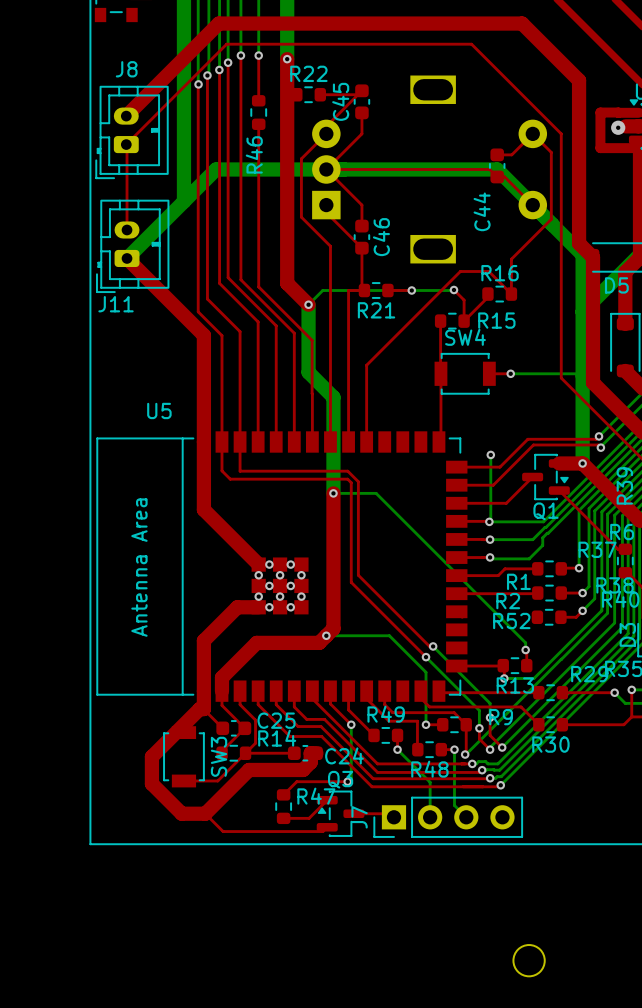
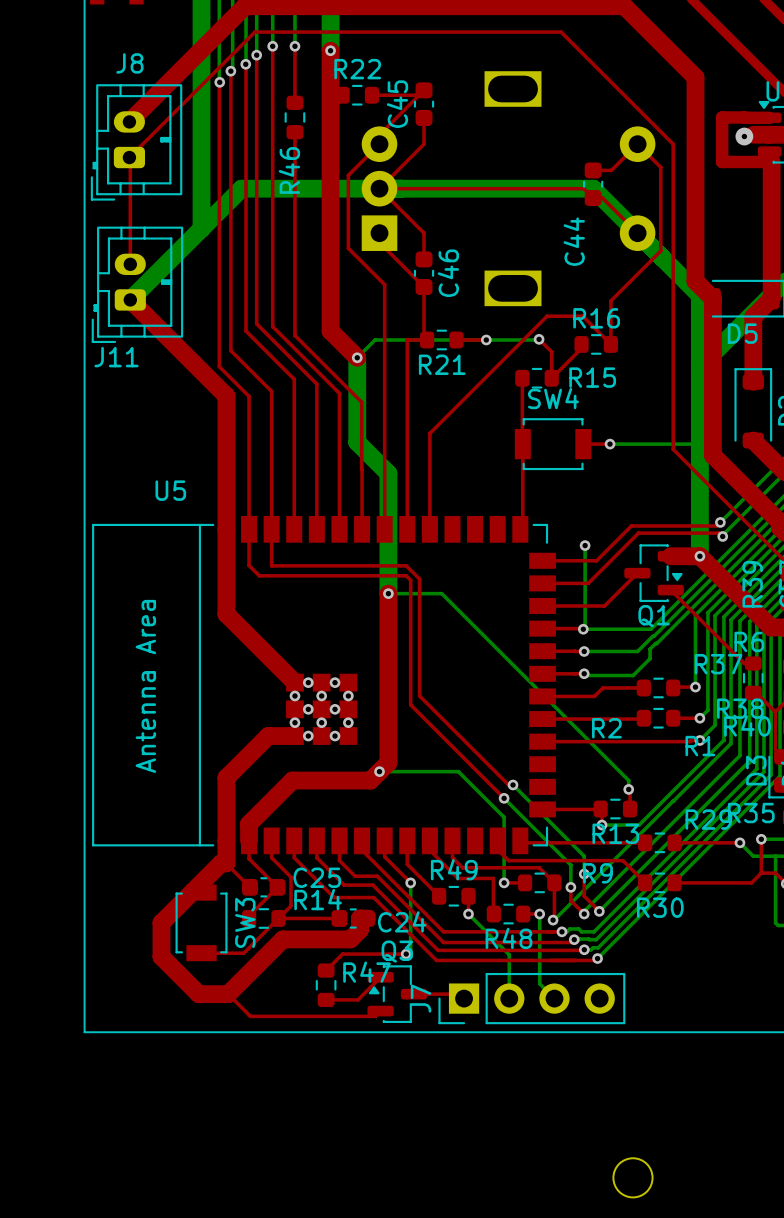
R1 name position: R1 (518, 581) -> R1 (700, 746)
top track: (582, 610) (576, 617) (560, 617) -> (699, 740) (542, 741)
R52: (549, 617) -> none

